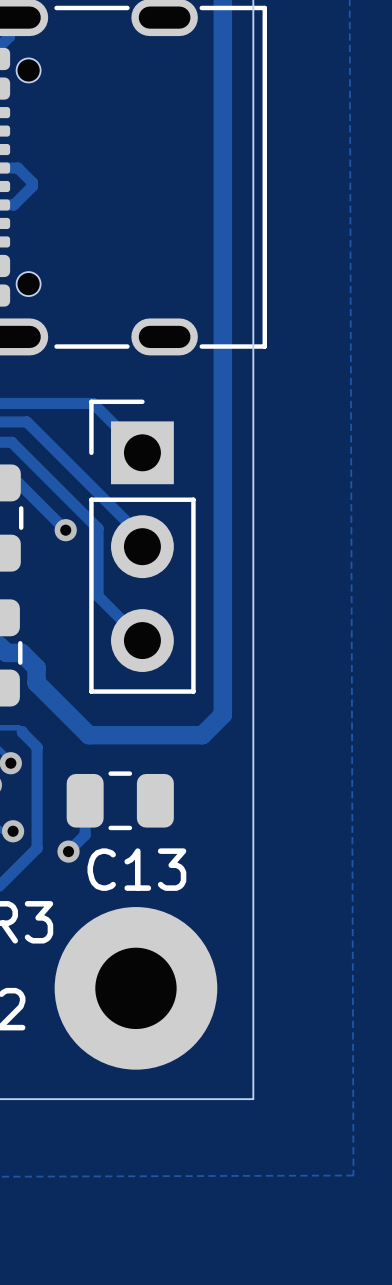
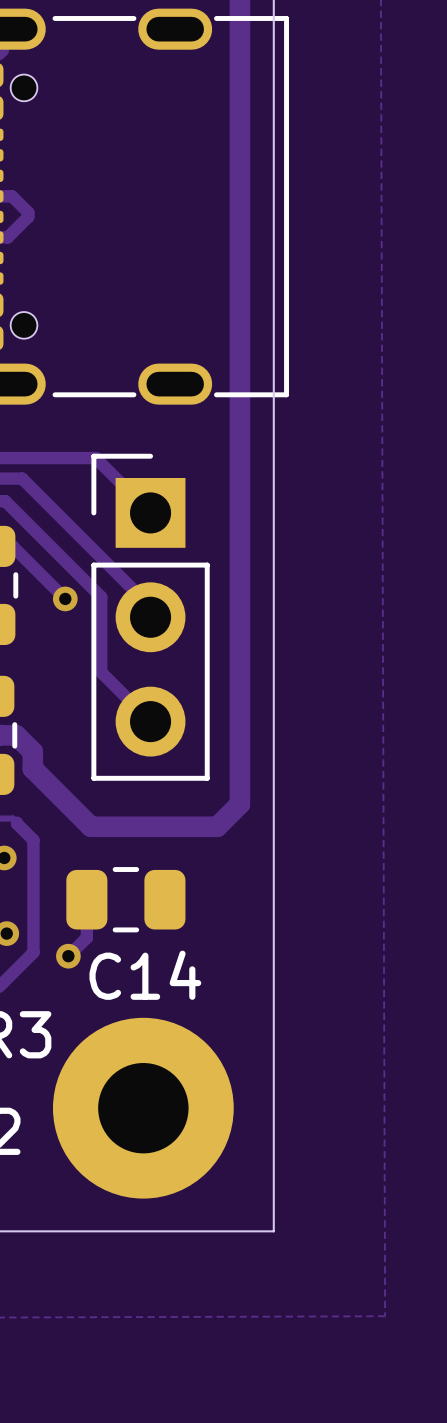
C13 name: C13 (136, 869) -> C14 (145, 975)

